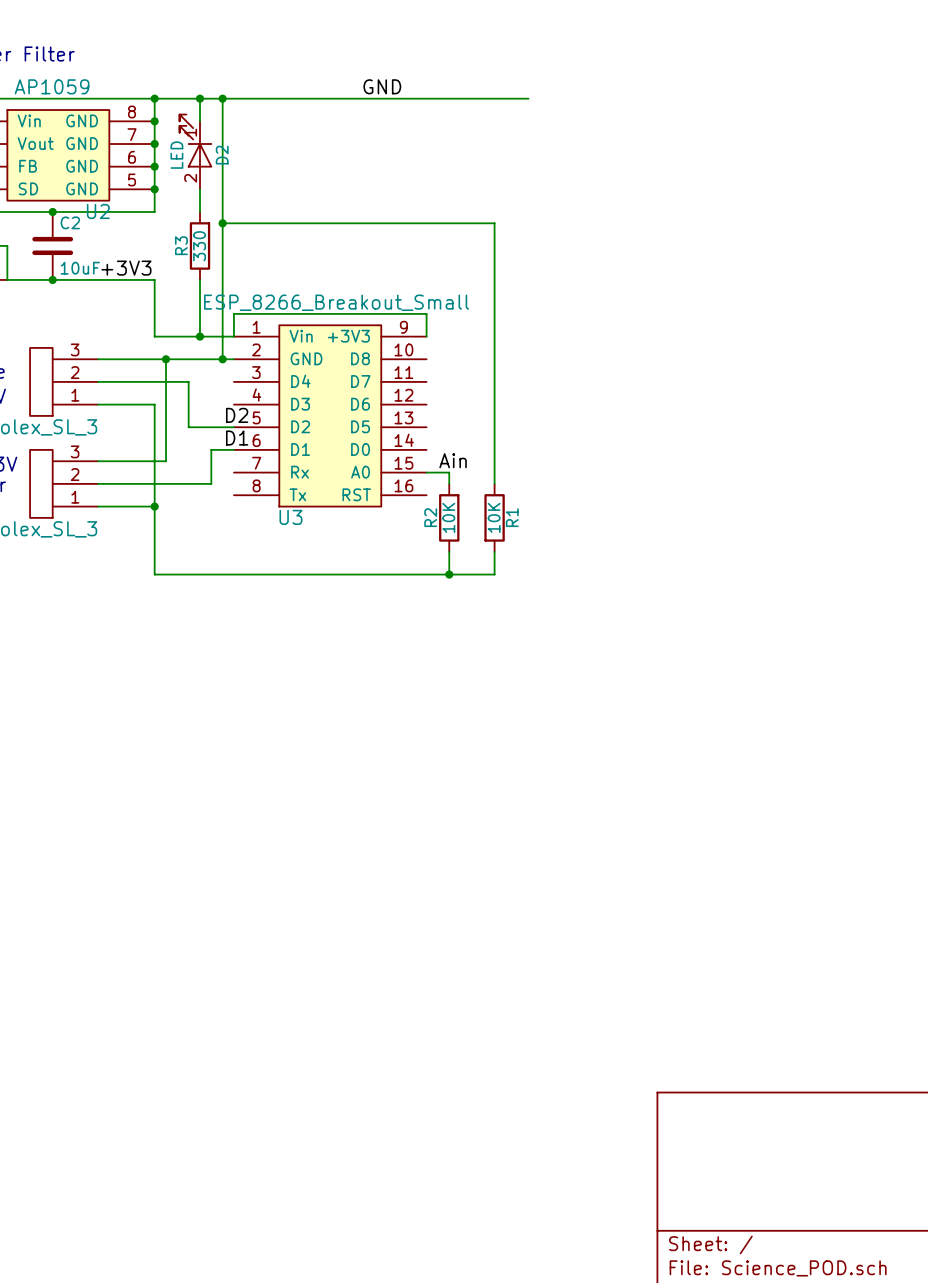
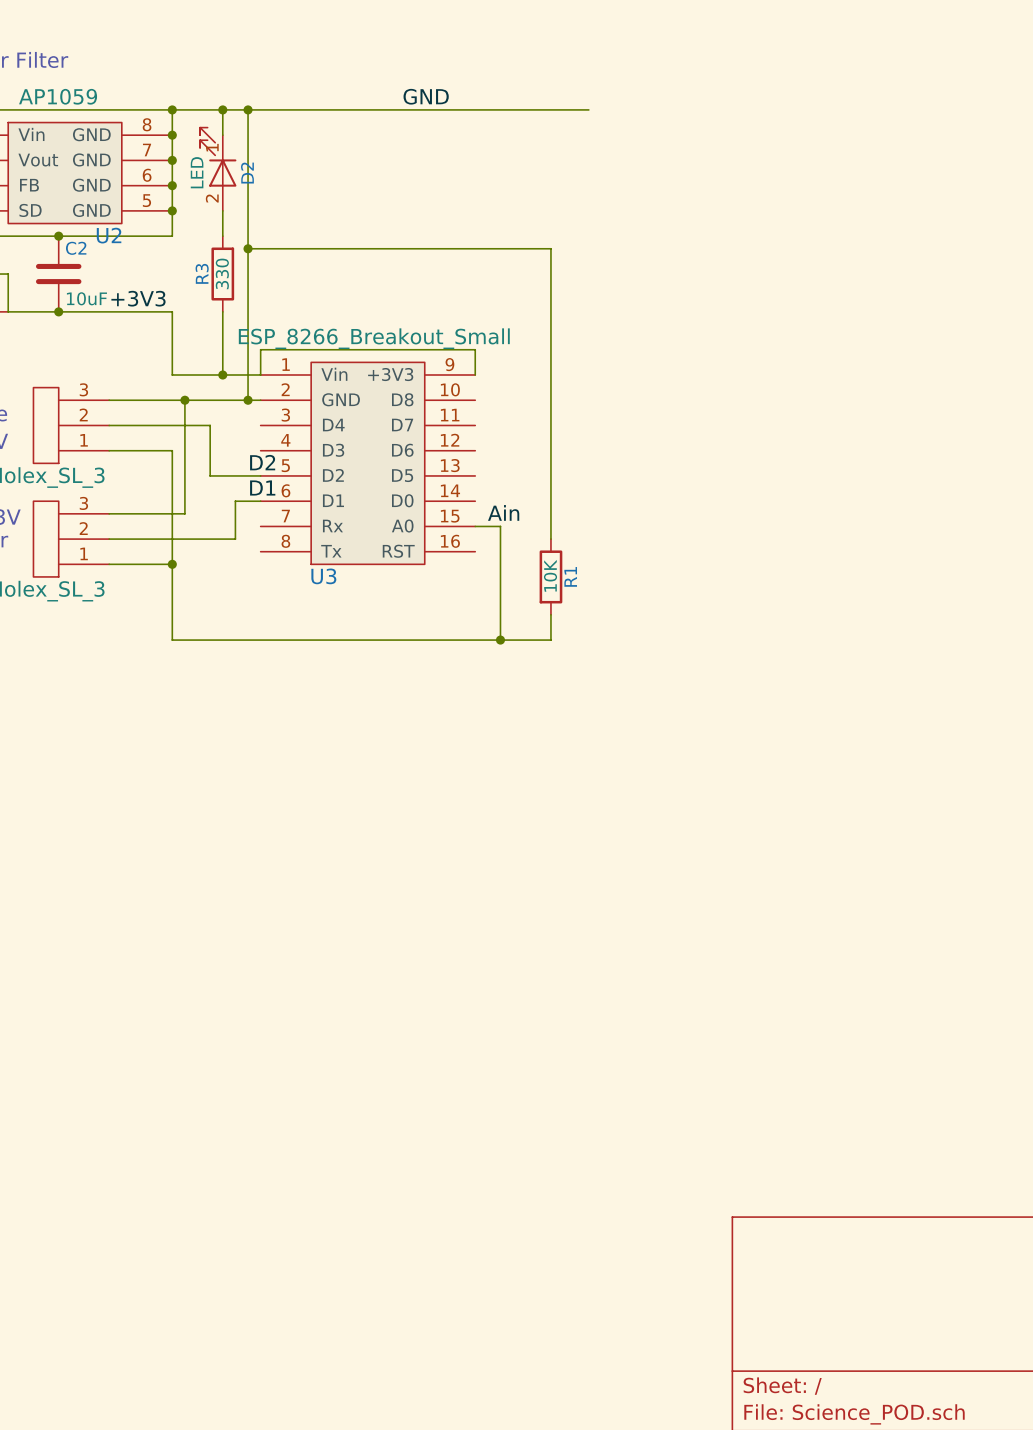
wire: none -> (500, 539) (500, 614)
R2: 10K (449, 517) -> none

